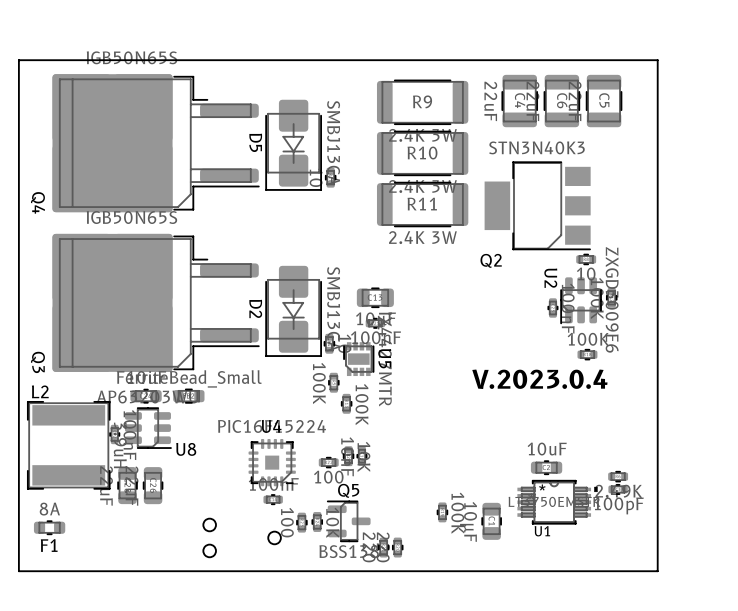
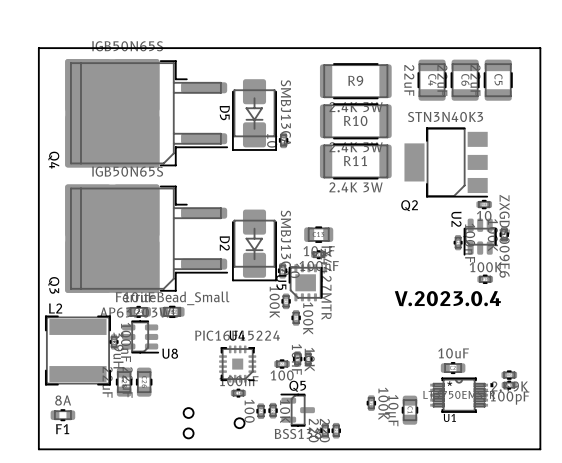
U5 footprint: [343, 342, 375, 377] -> [288, 264, 323, 302]
U5 name position: U5 (384, 358) -> U5 (281, 282)

